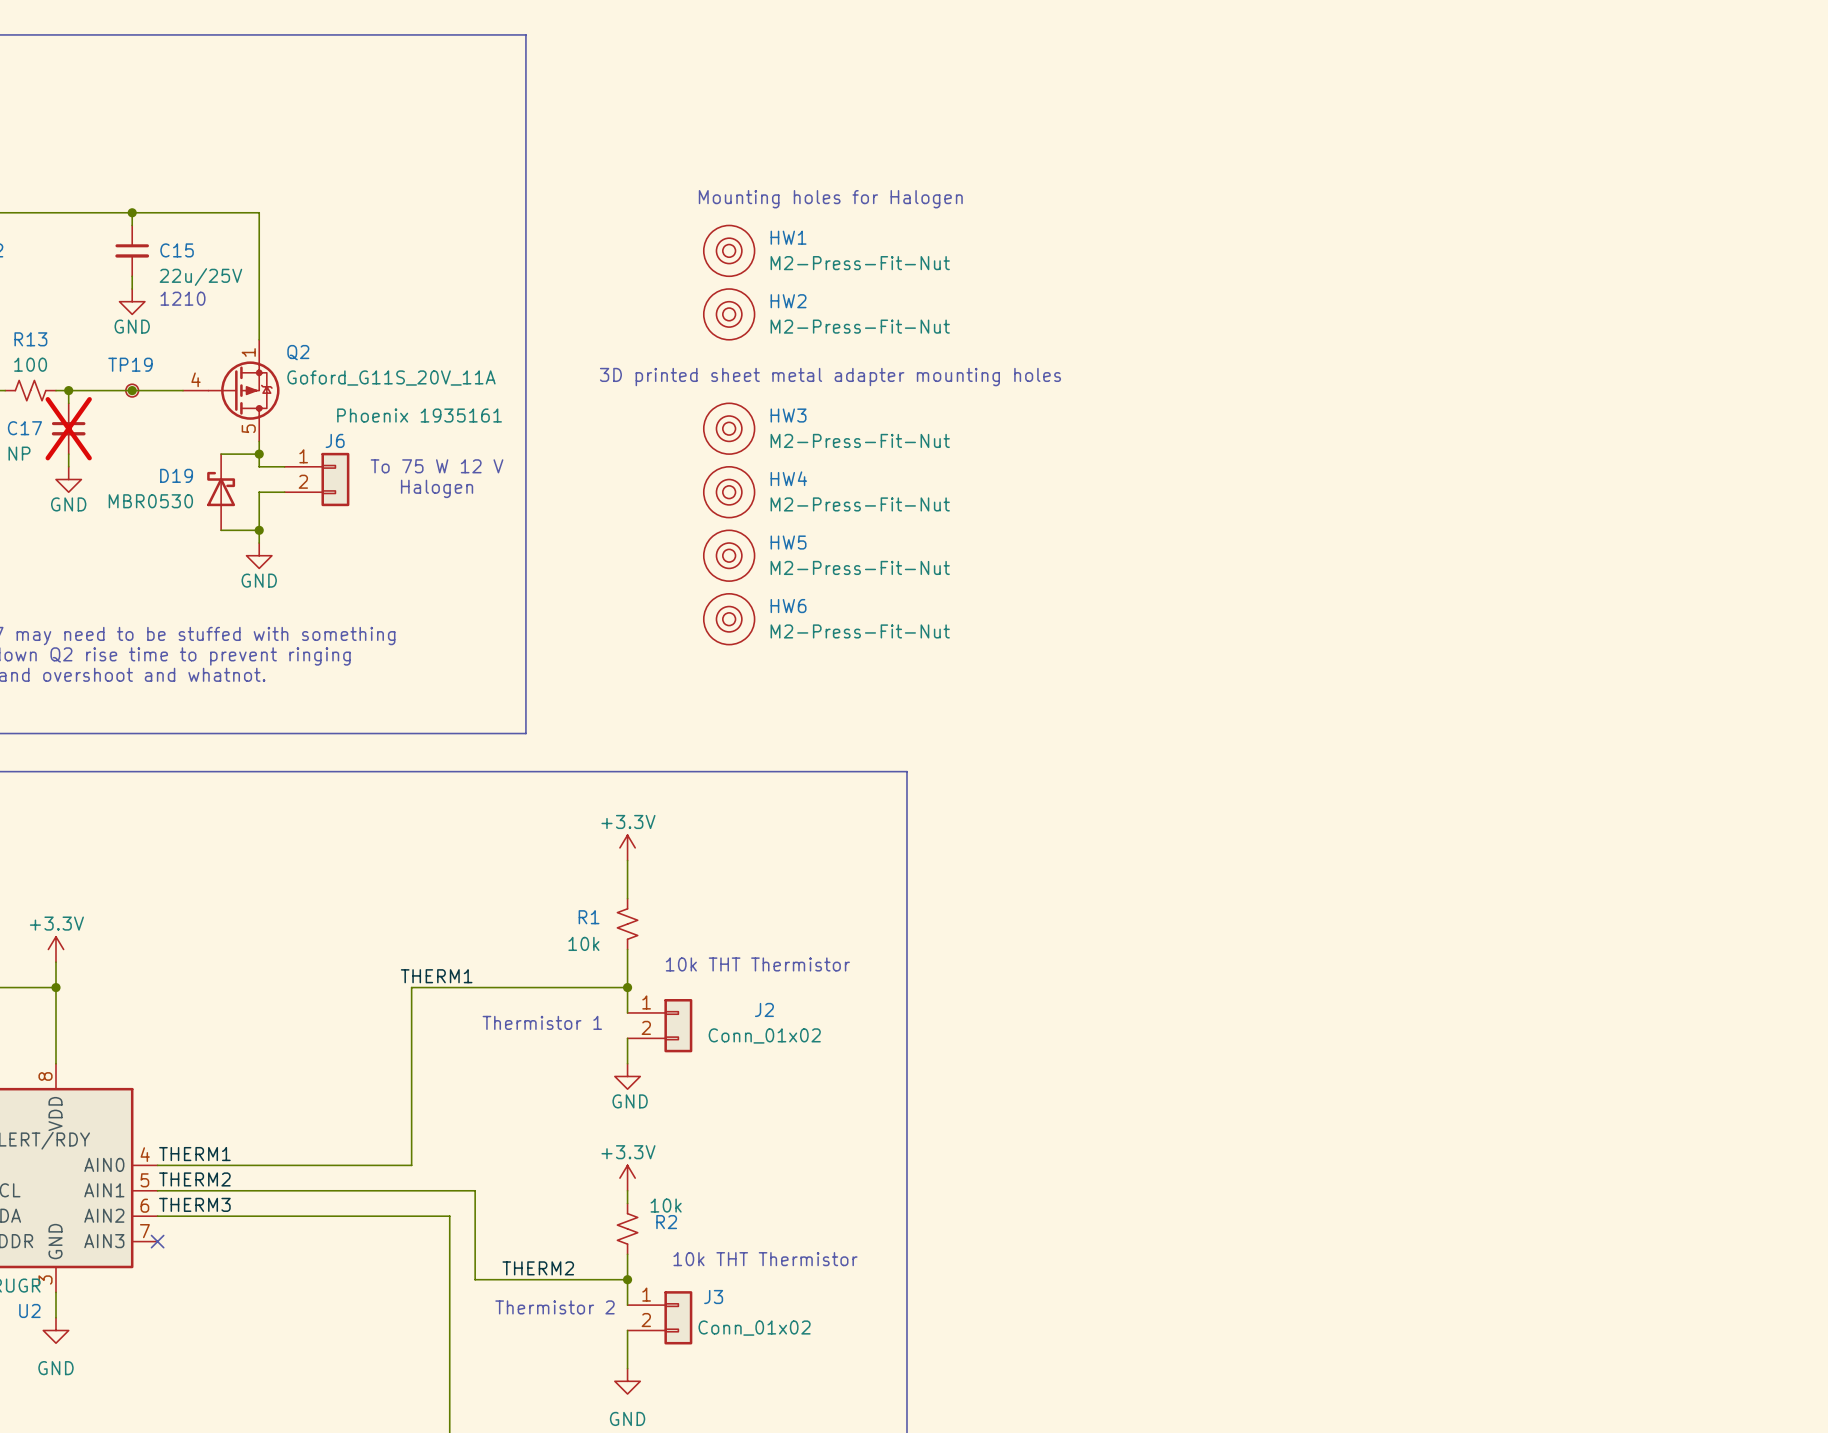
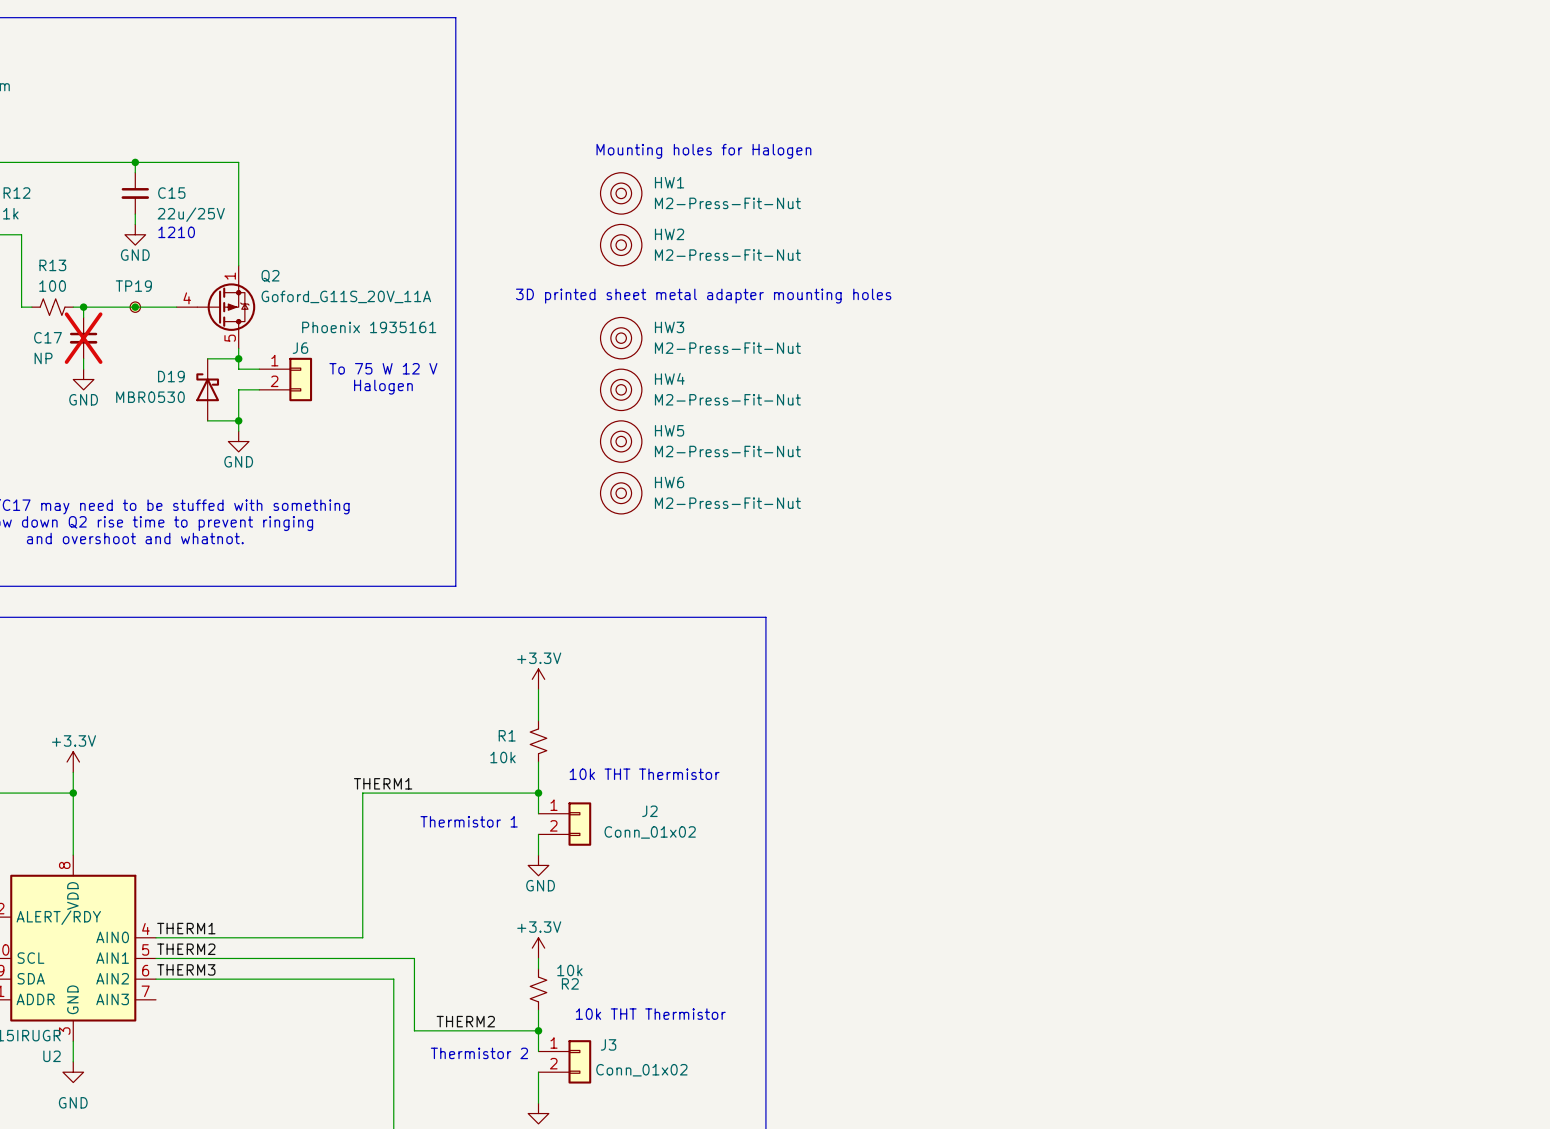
no-connect mark: (157, 1241) -> none

